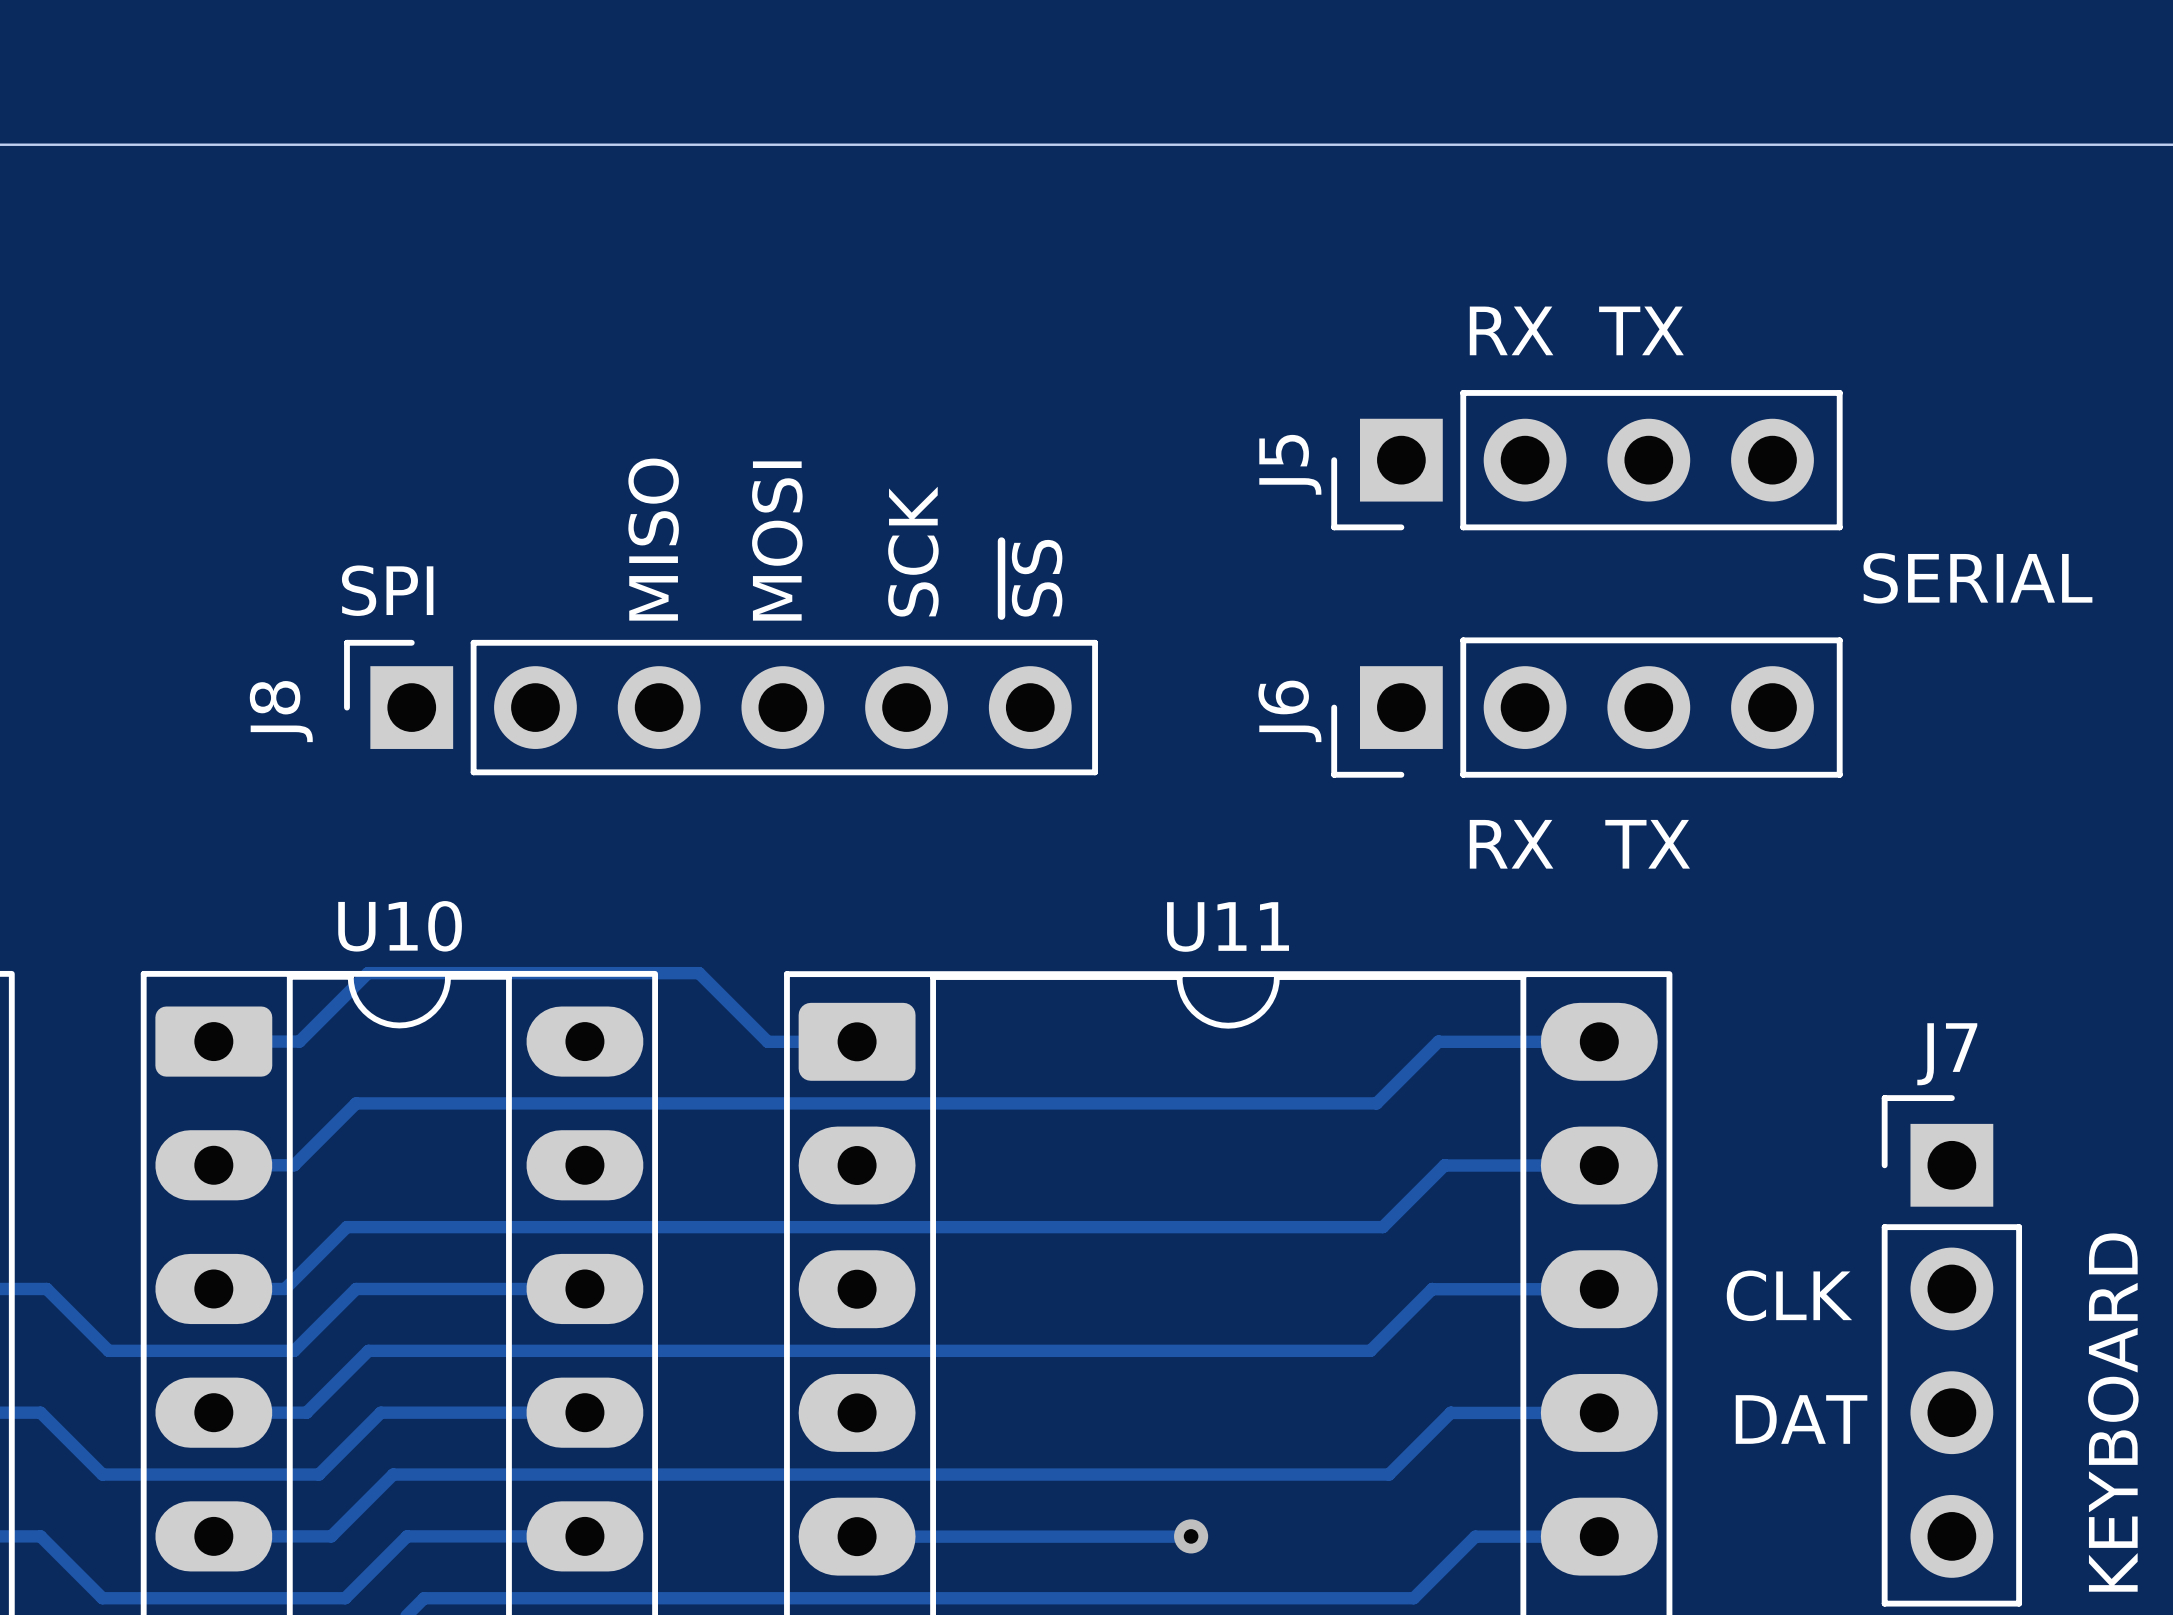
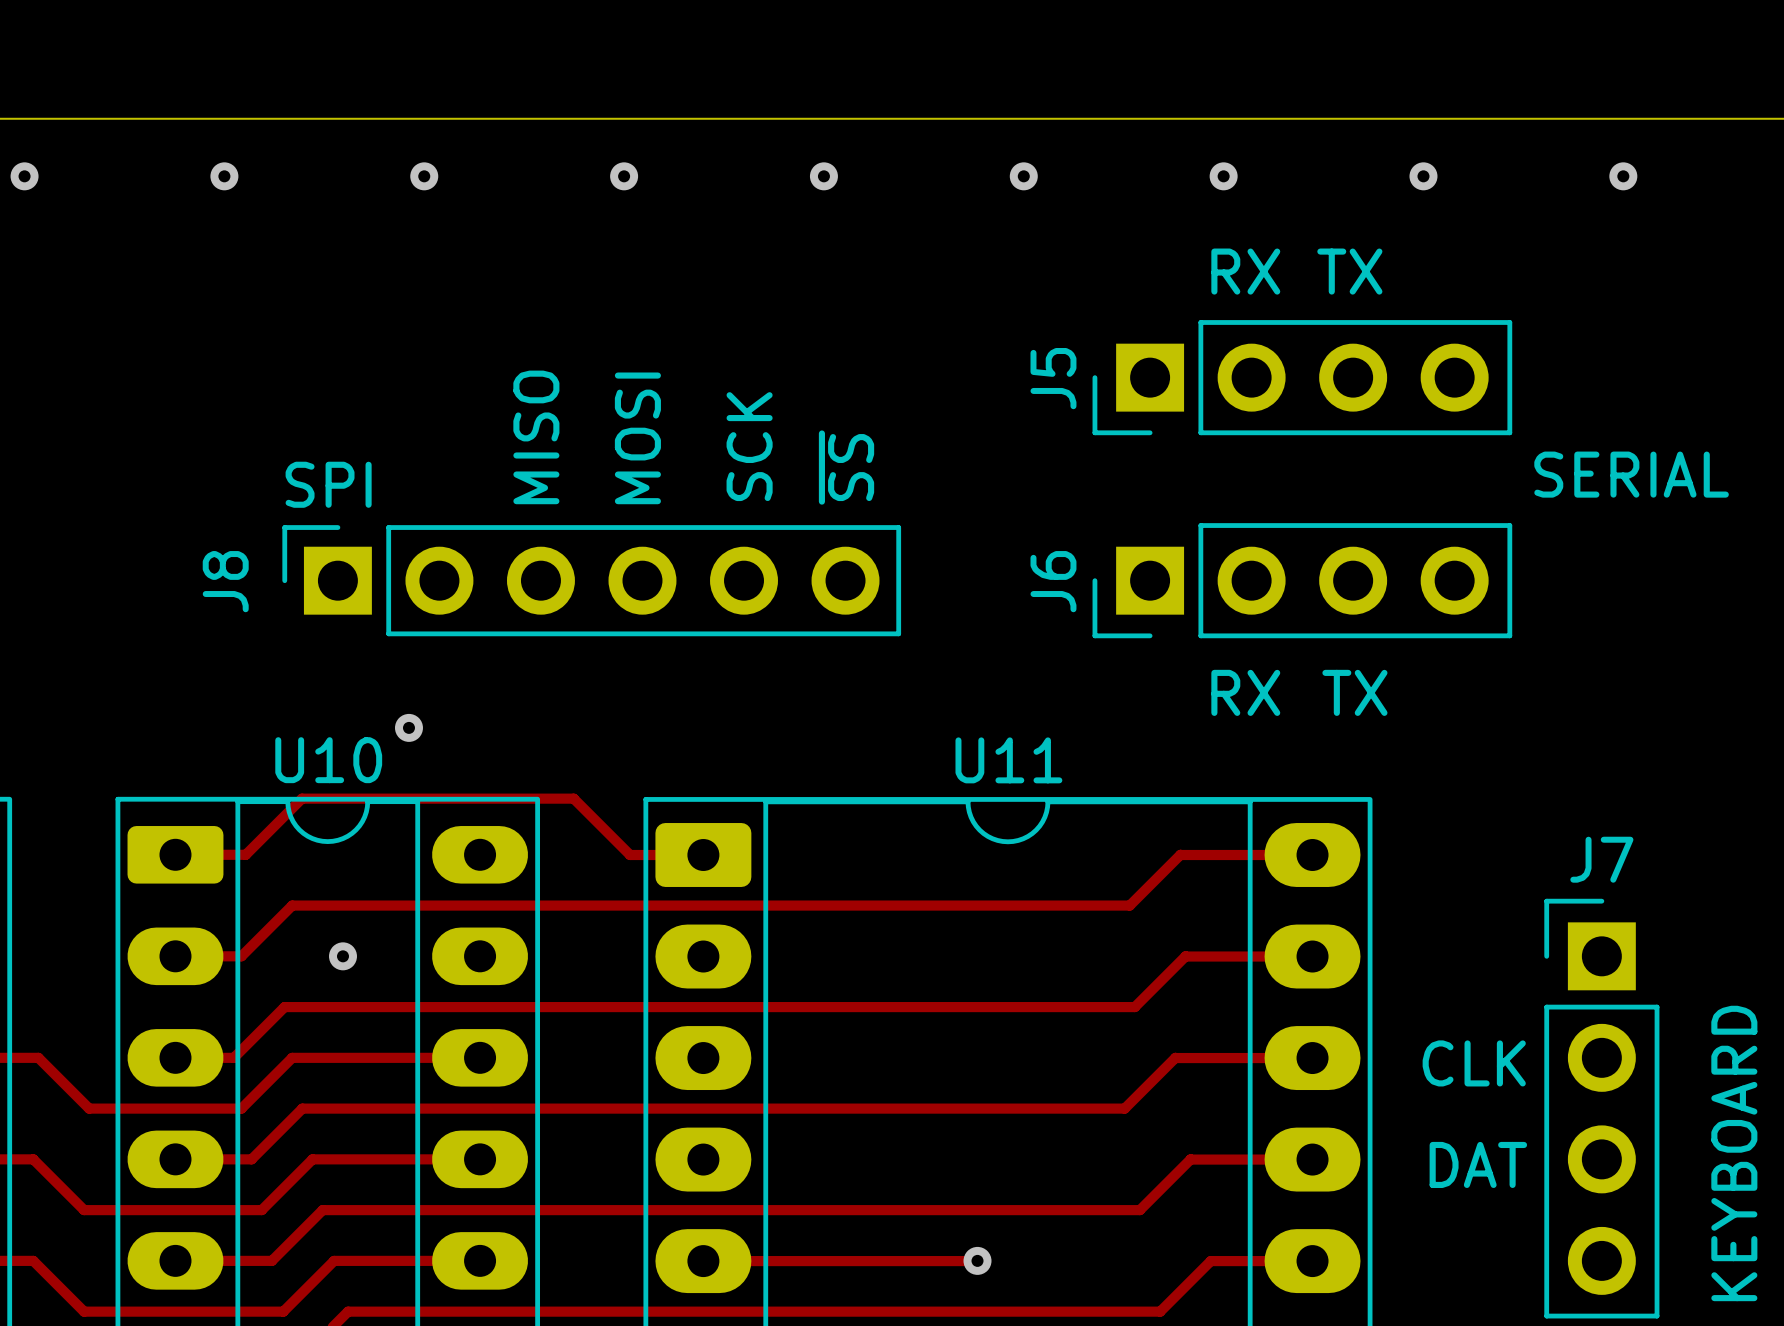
via: none -> (24, 176)
via: none -> (224, 176)
via: none -> (424, 176)
via: none -> (624, 176)
via: none -> (823, 176)
via: none -> (1023, 176)
via: none -> (1223, 176)
via: none -> (1423, 176)
via: none -> (1623, 176)
via: none -> (408, 727)
via: none -> (342, 956)

